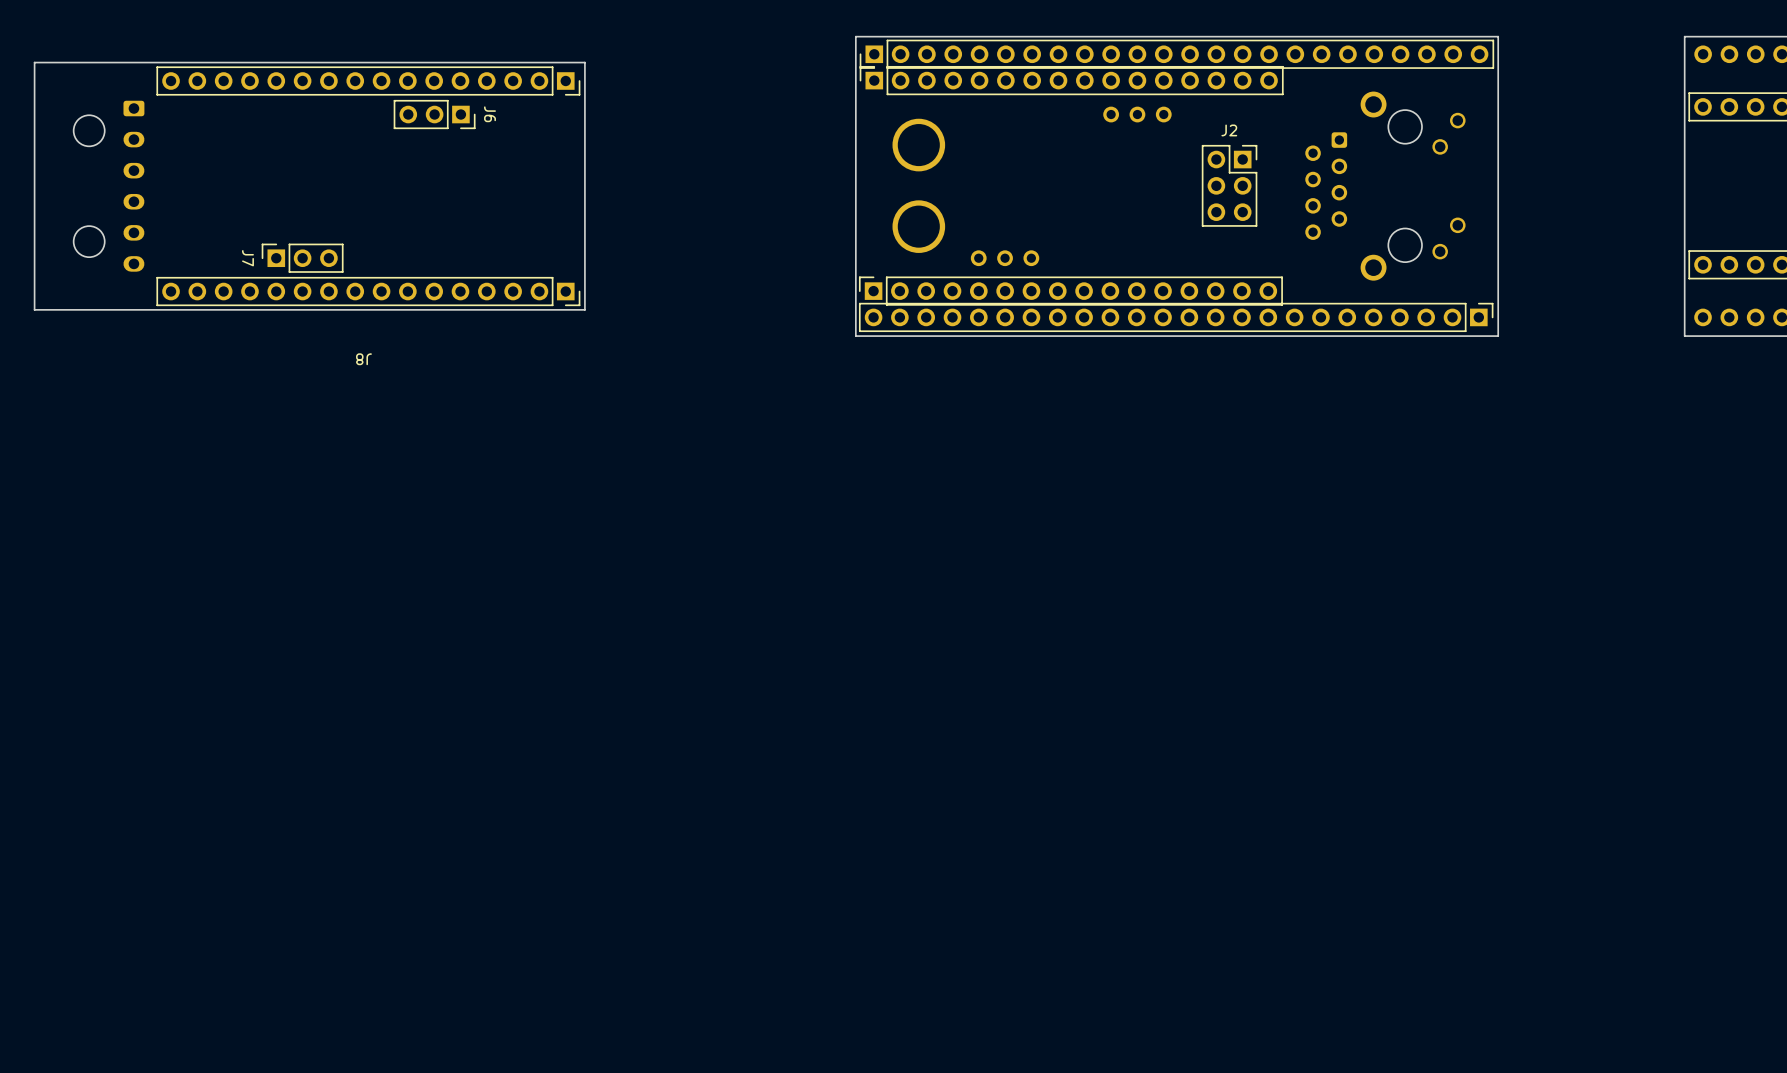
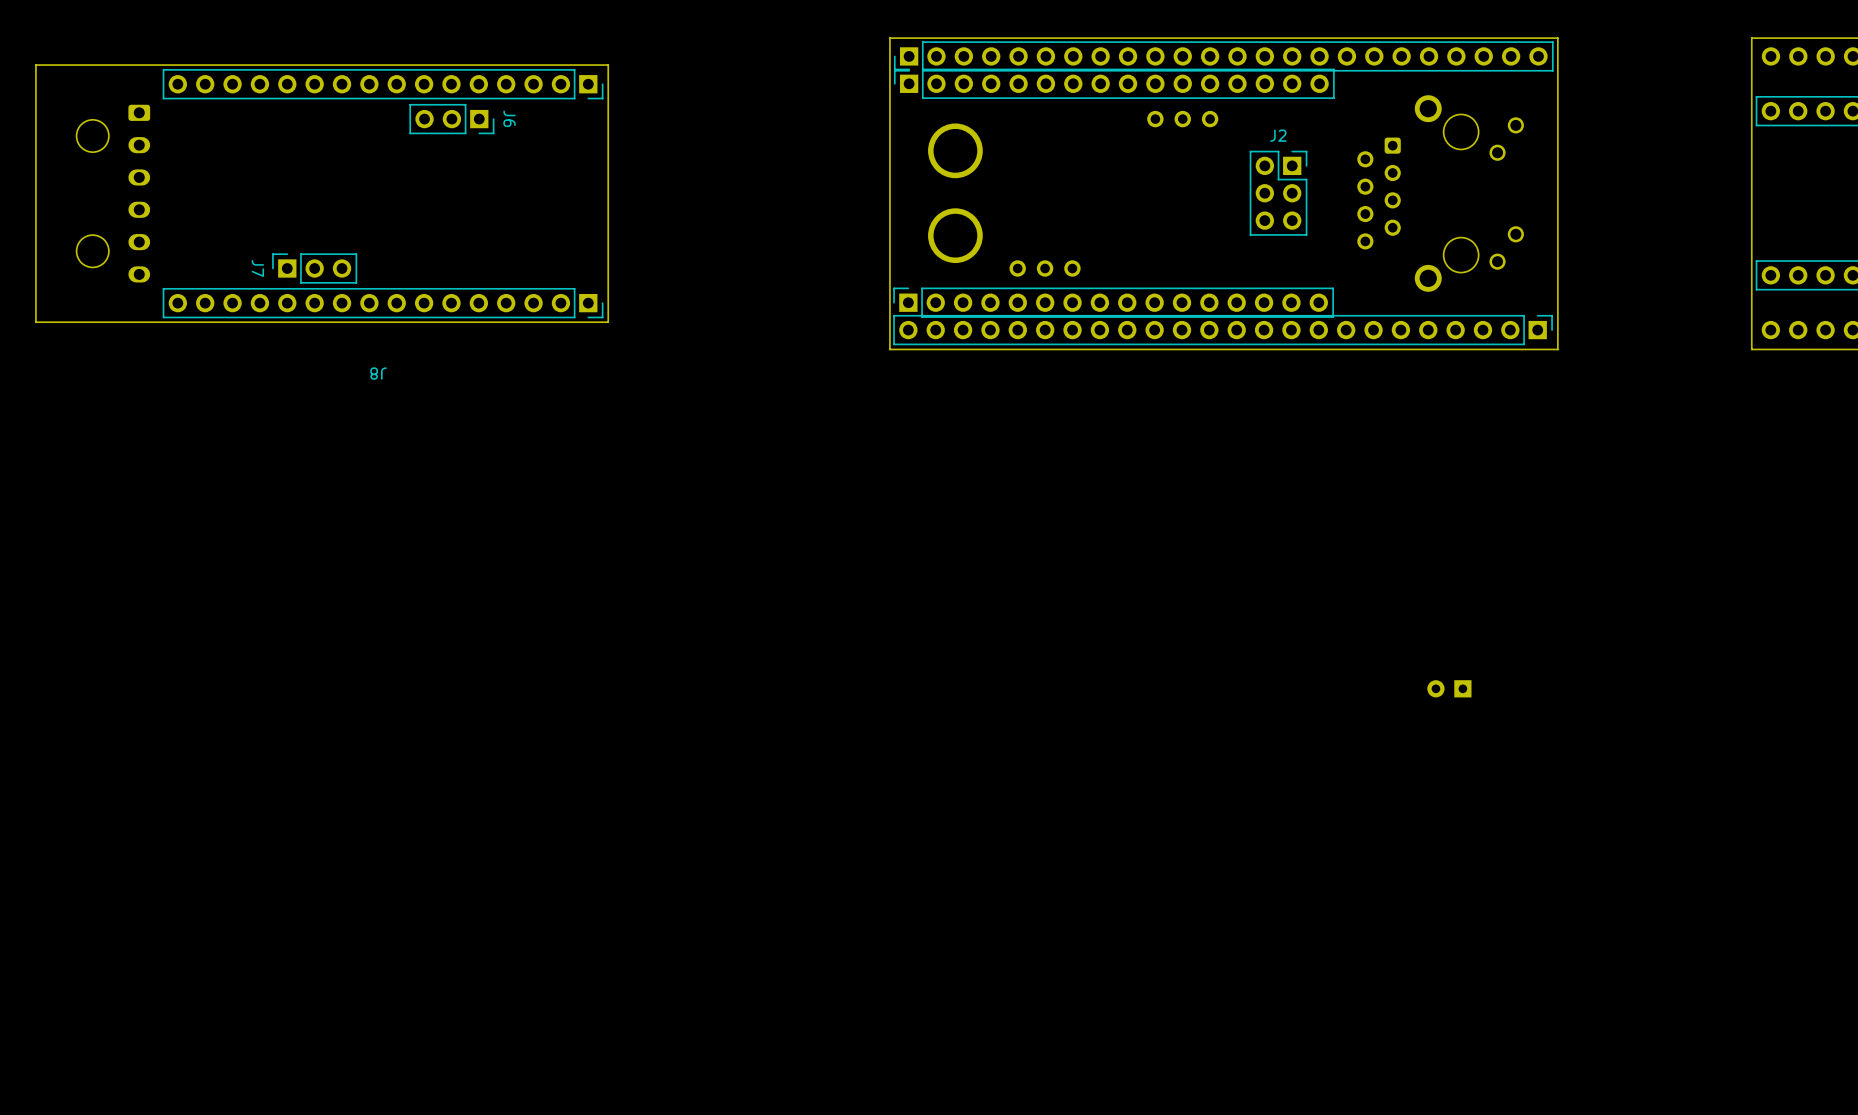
part: none -> (1449, 688)

